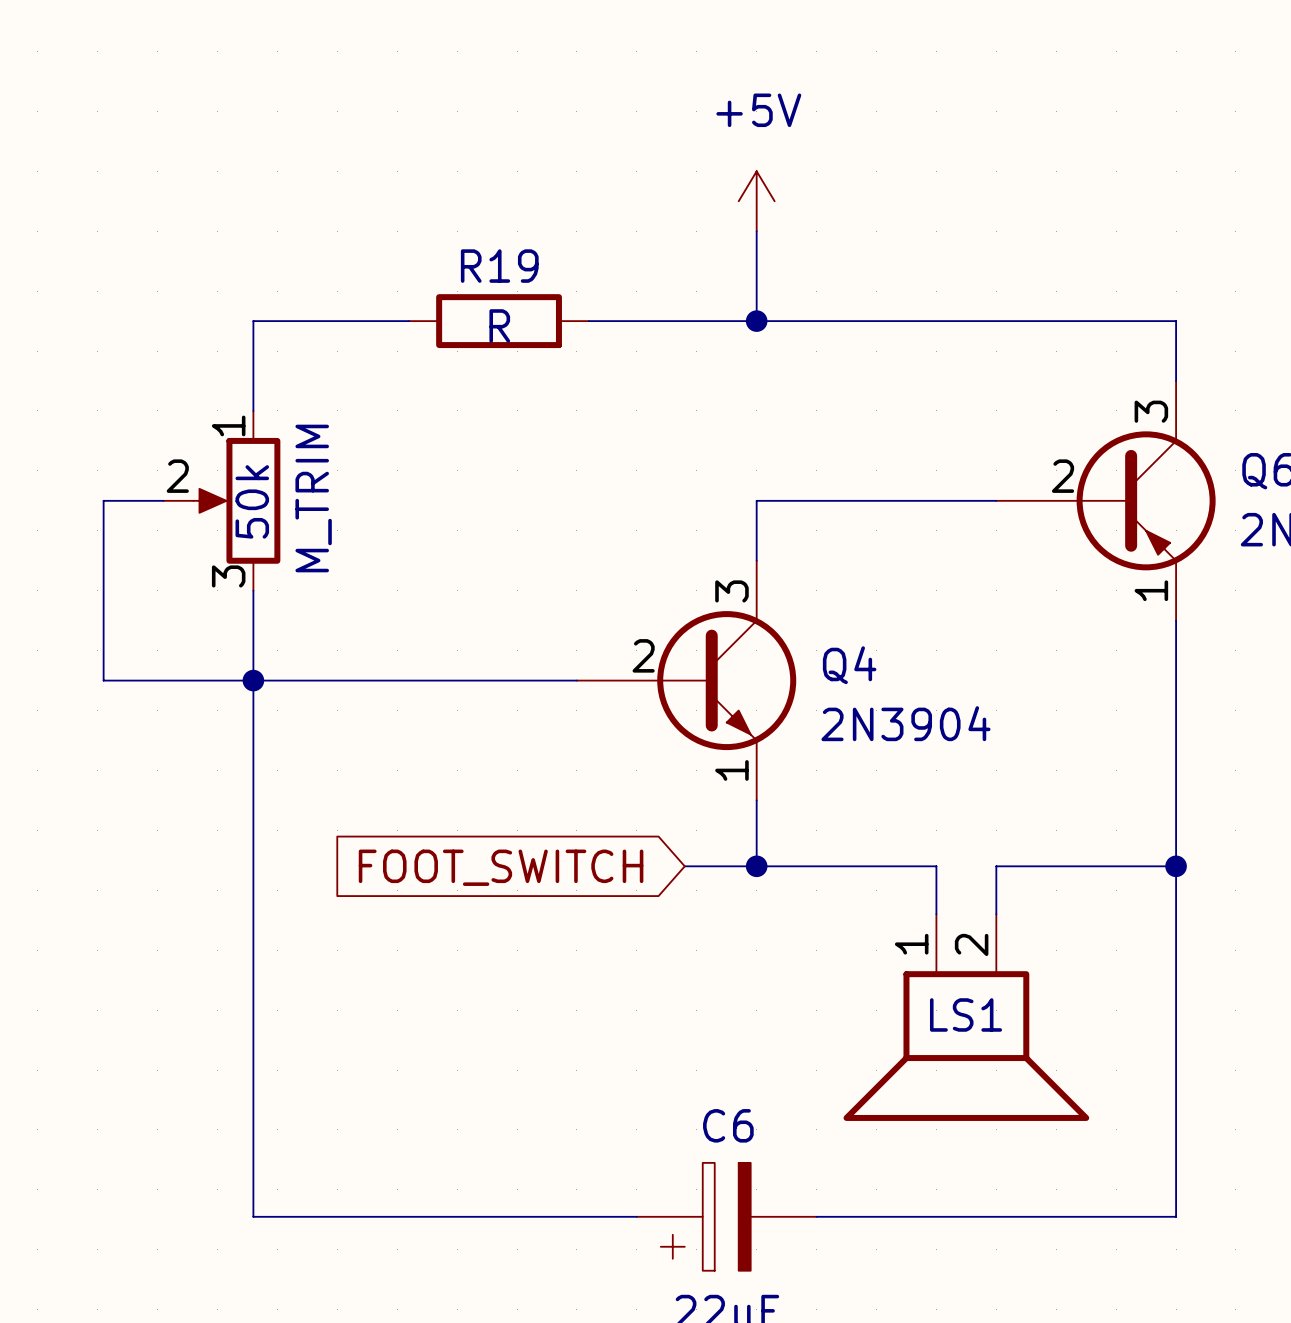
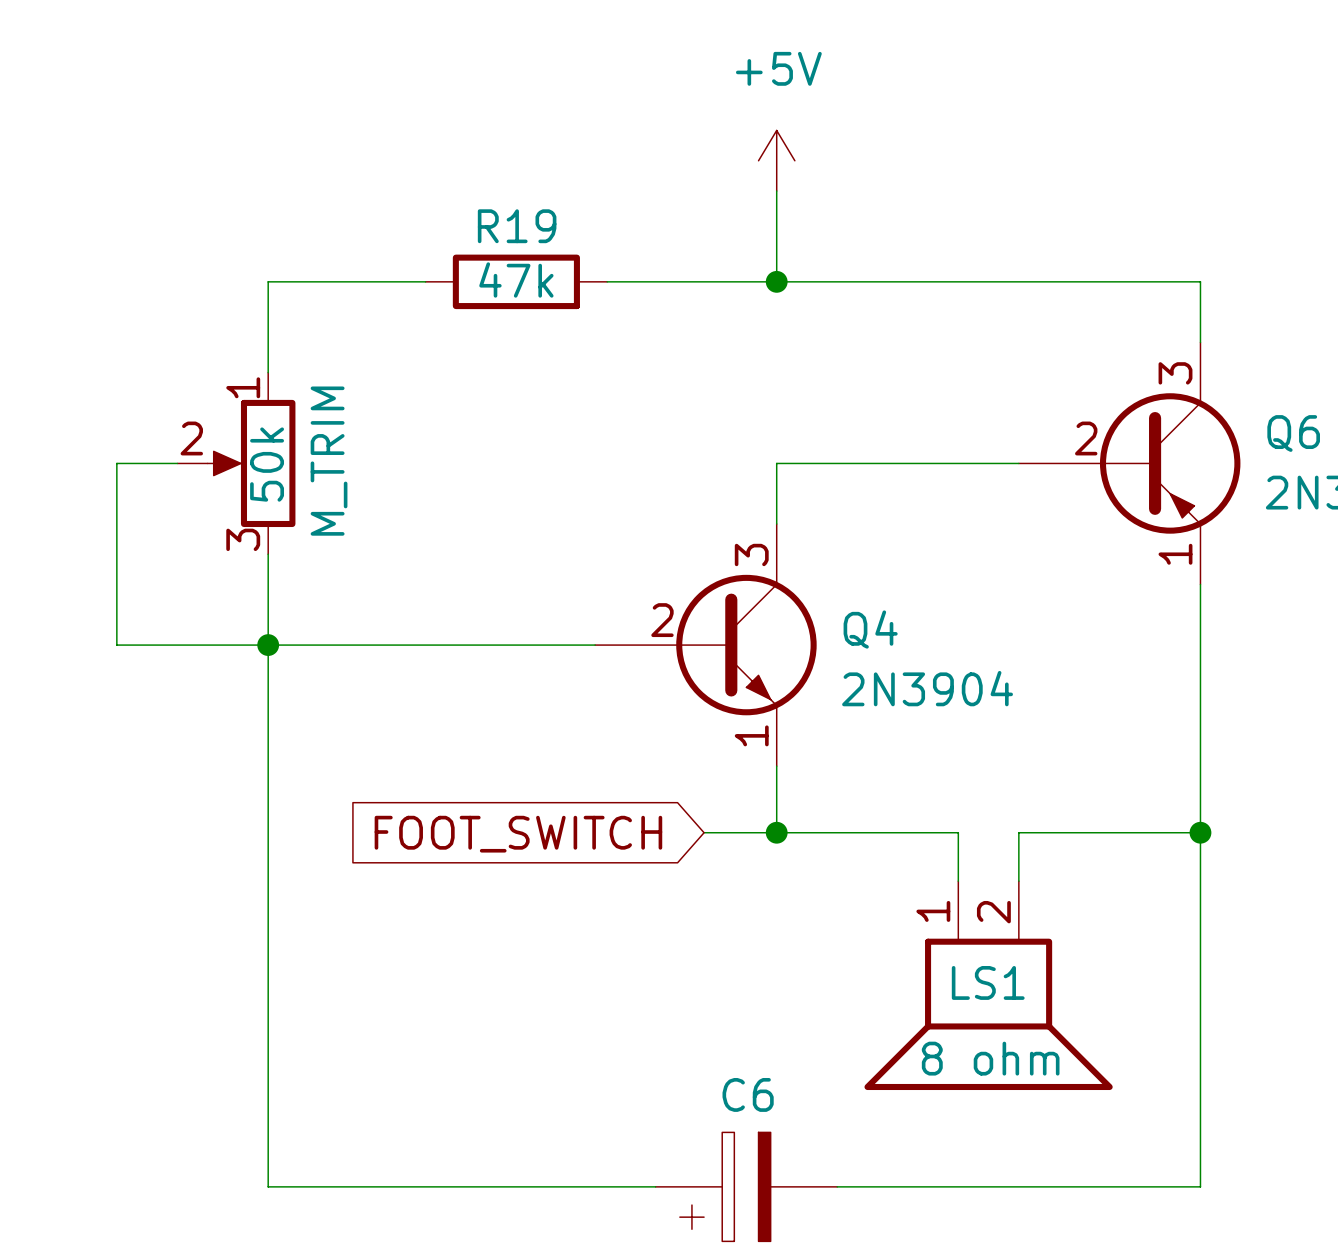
R19 value: R (499, 325) -> 47k (516, 279)
LS1 value: none -> 8 ohm (990, 1058)

